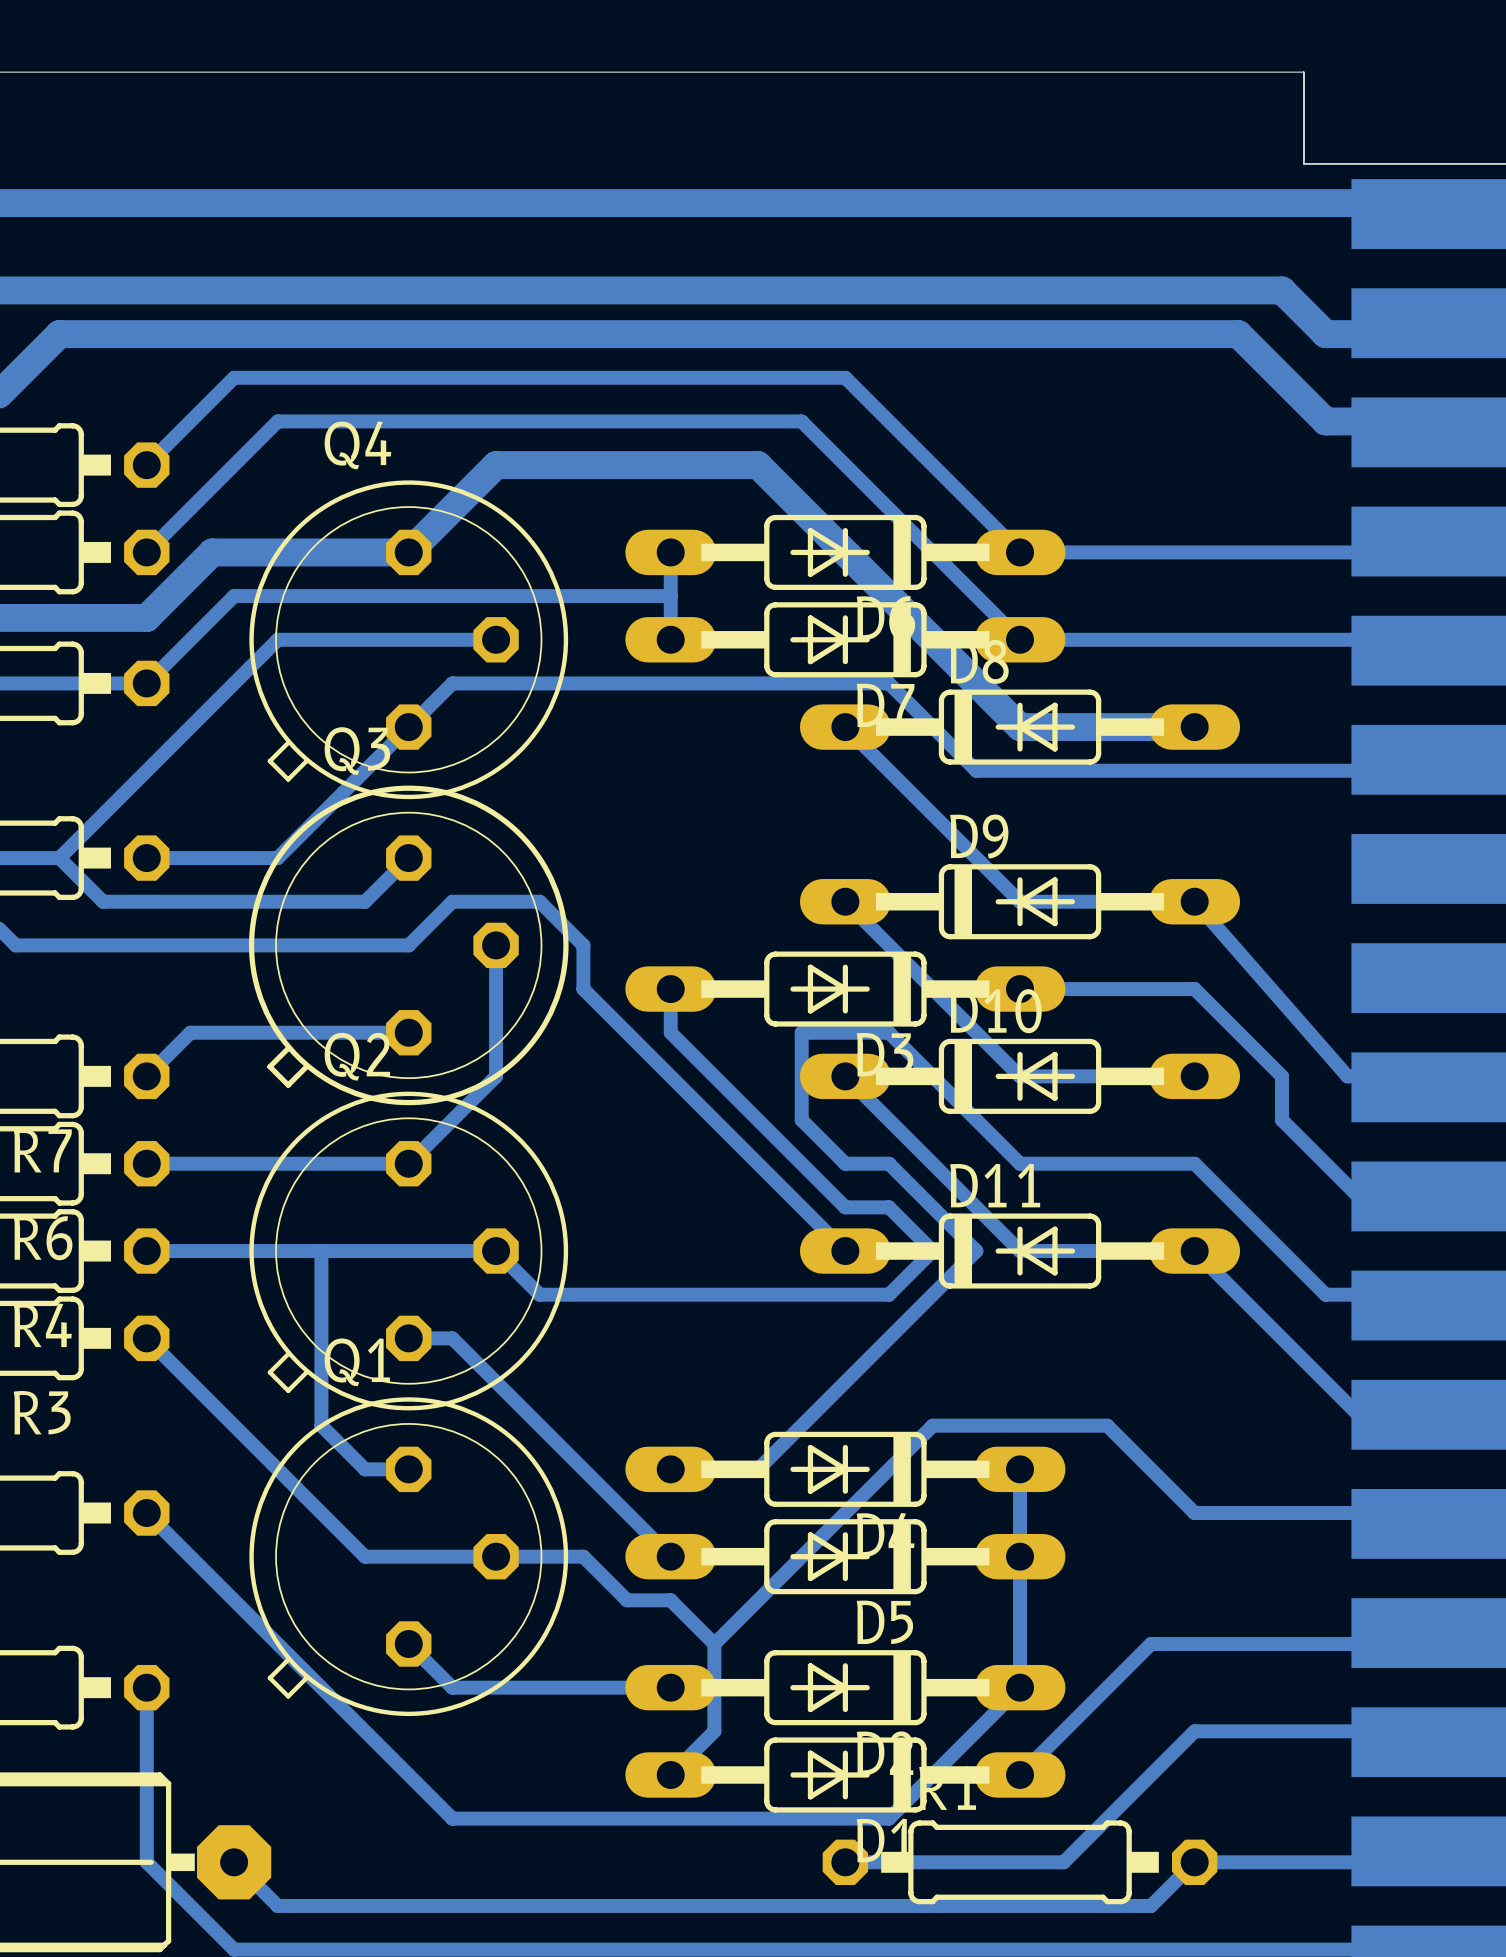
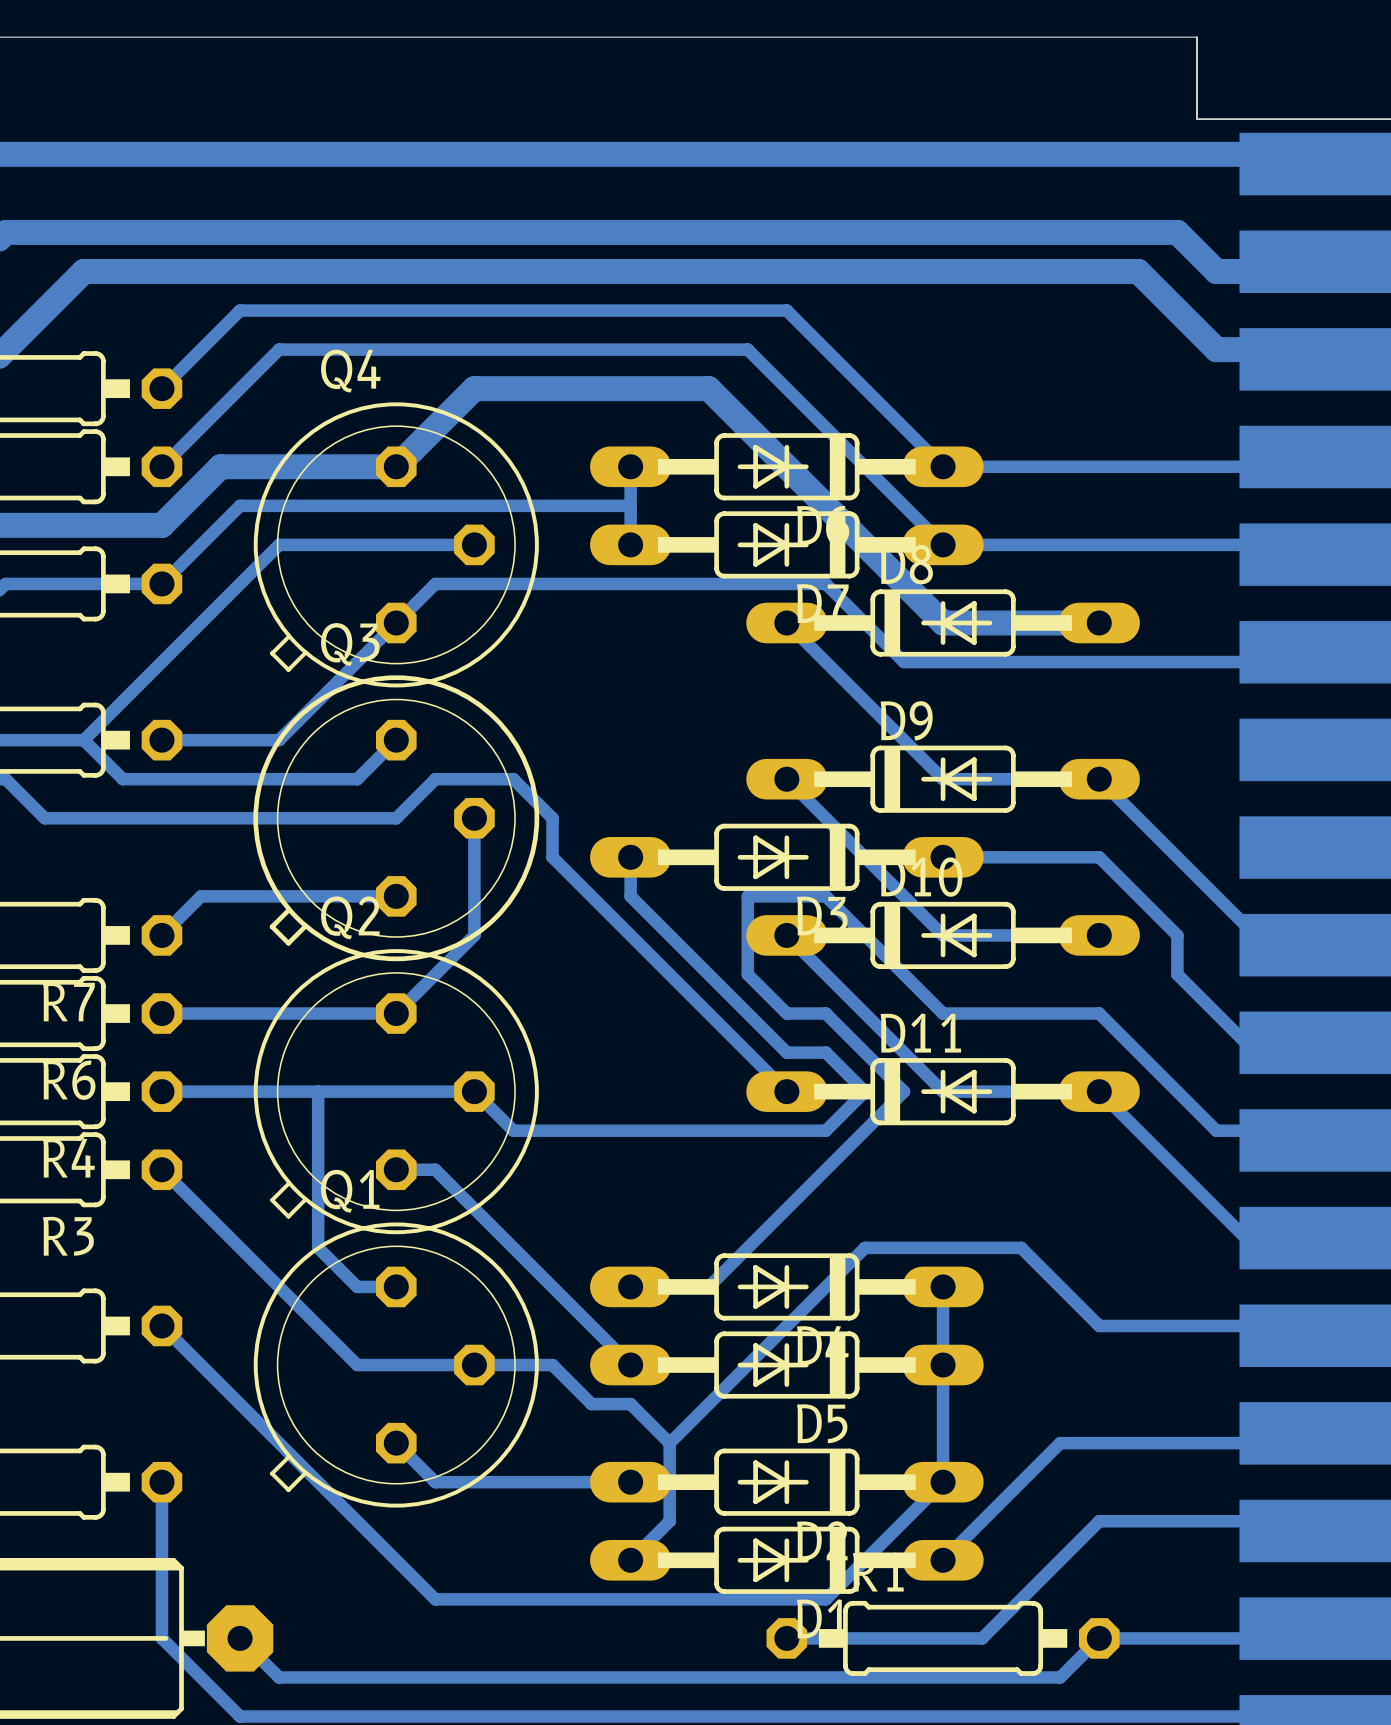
bottom track: (1194, 901) (1347, 1076) (1369, 1076) -> (1099, 779) (1255, 935)

